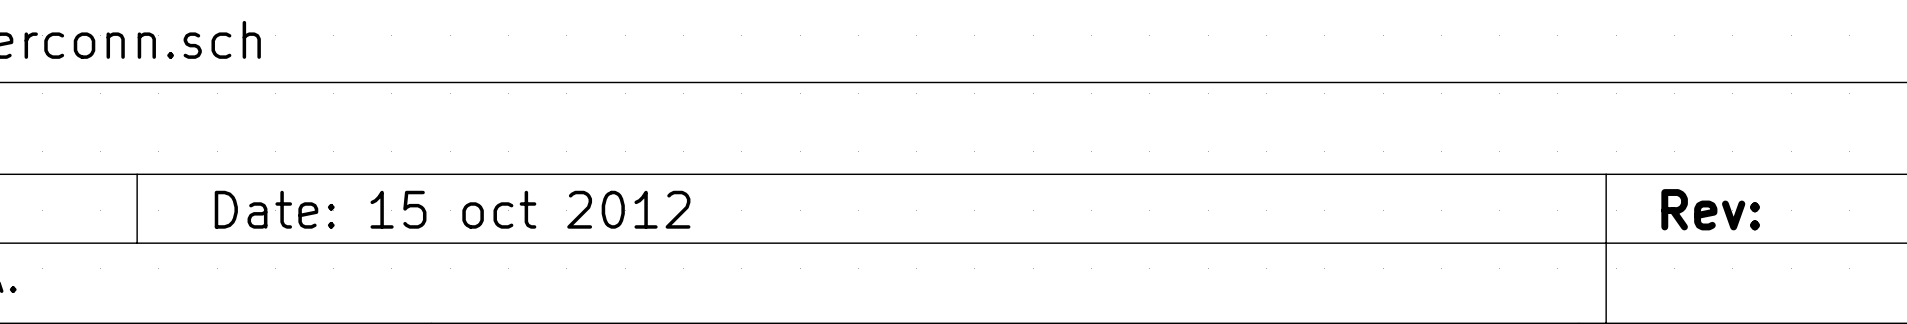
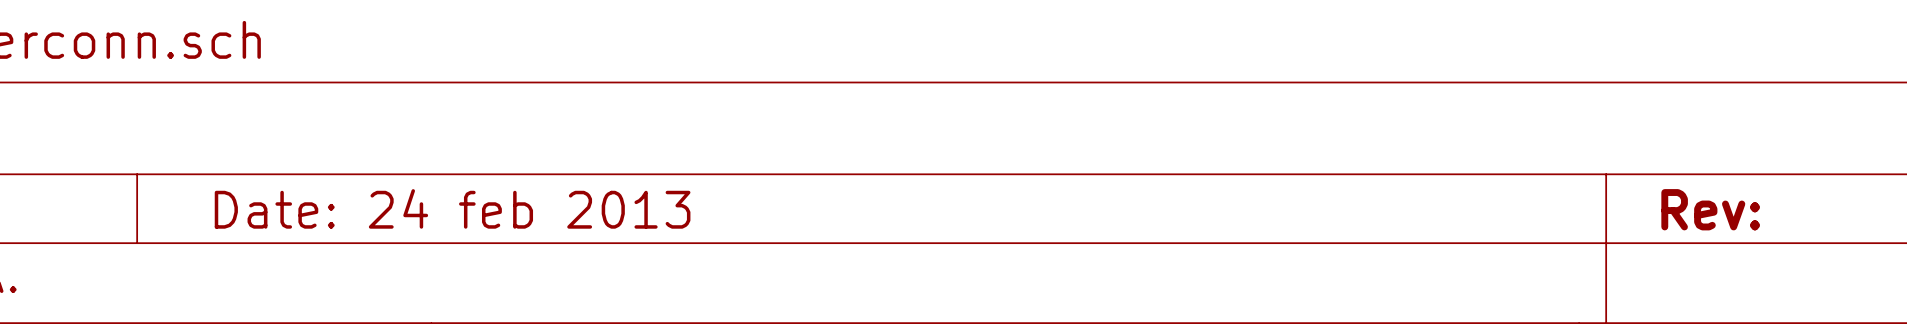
title block: Date: 15 oct 2012 (452, 209) -> Date: 24 feb 2013 (452, 208)

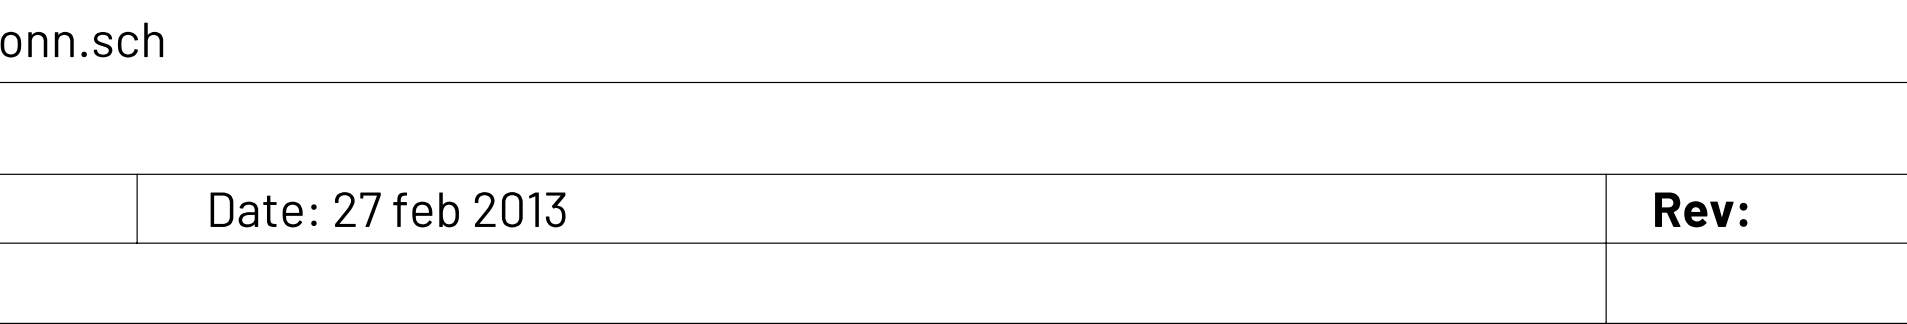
title block: Date: 24 feb 2013 (452, 208) -> Date: 27 feb 2013 (388, 209)

